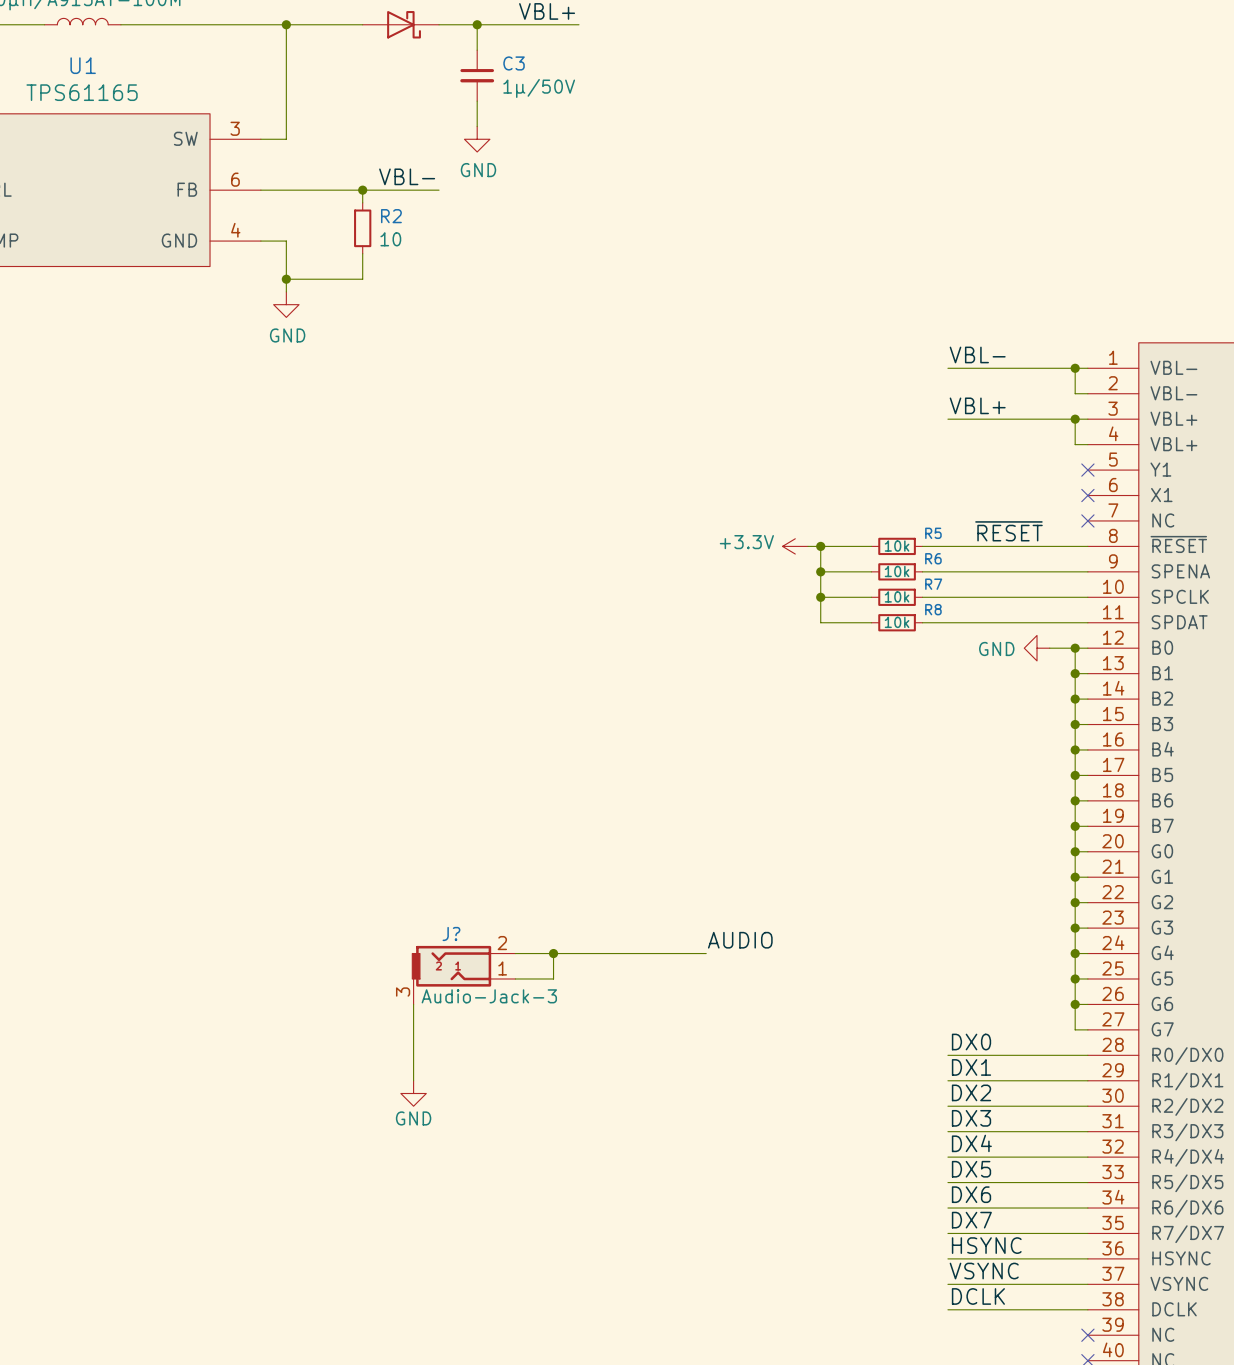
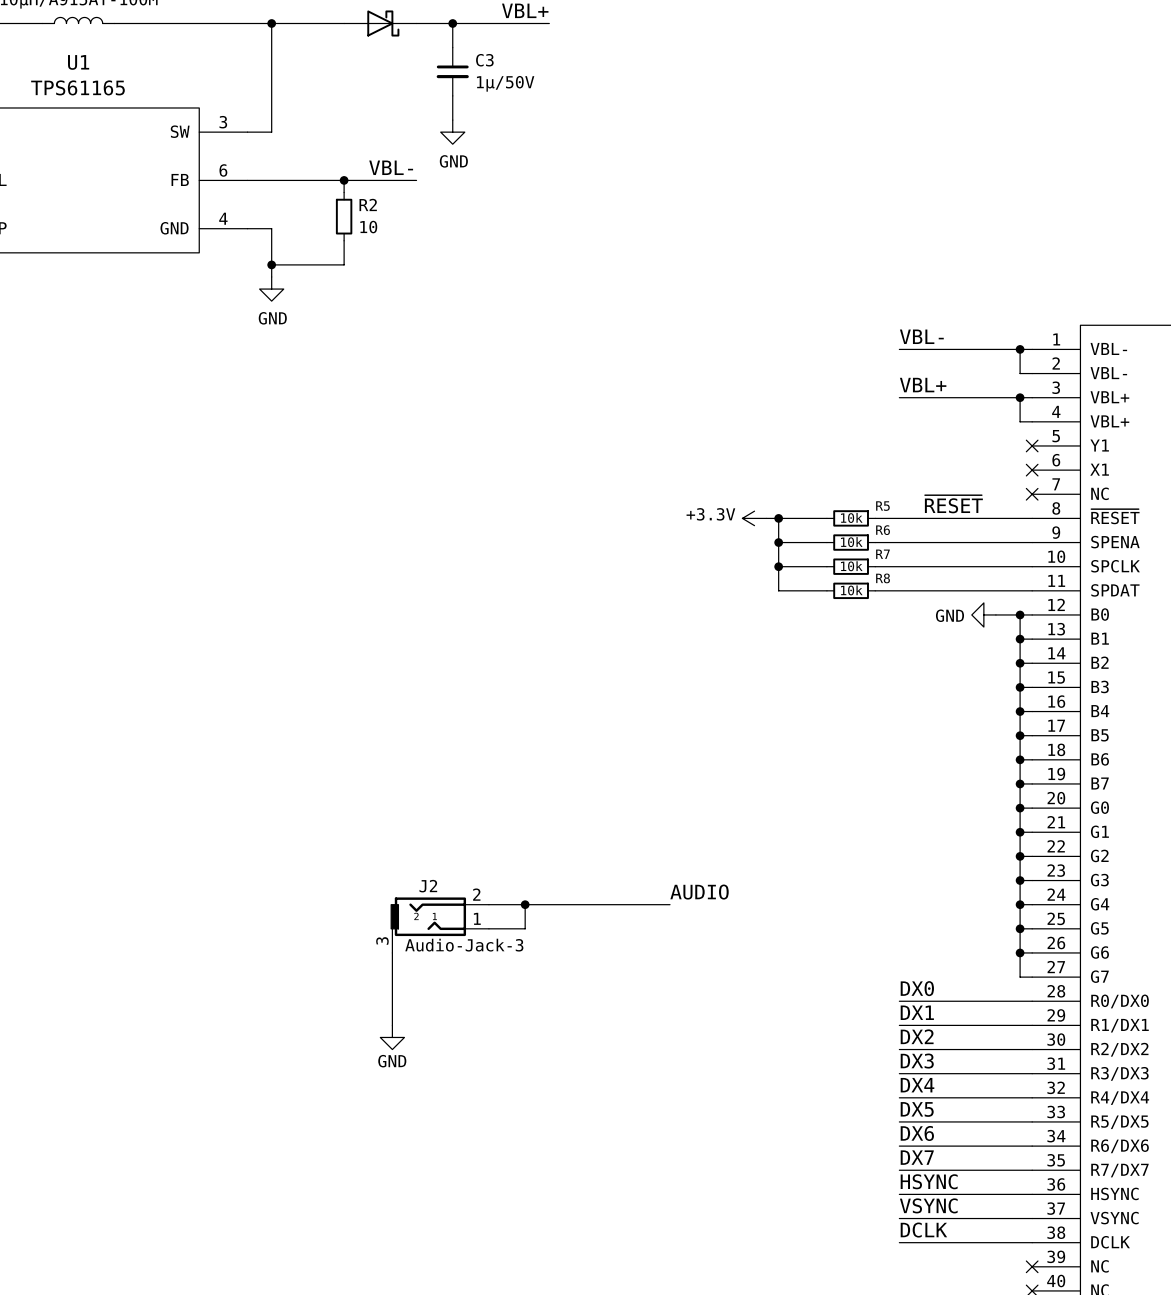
J? name: J? (451, 933) -> J2 (428, 886)

